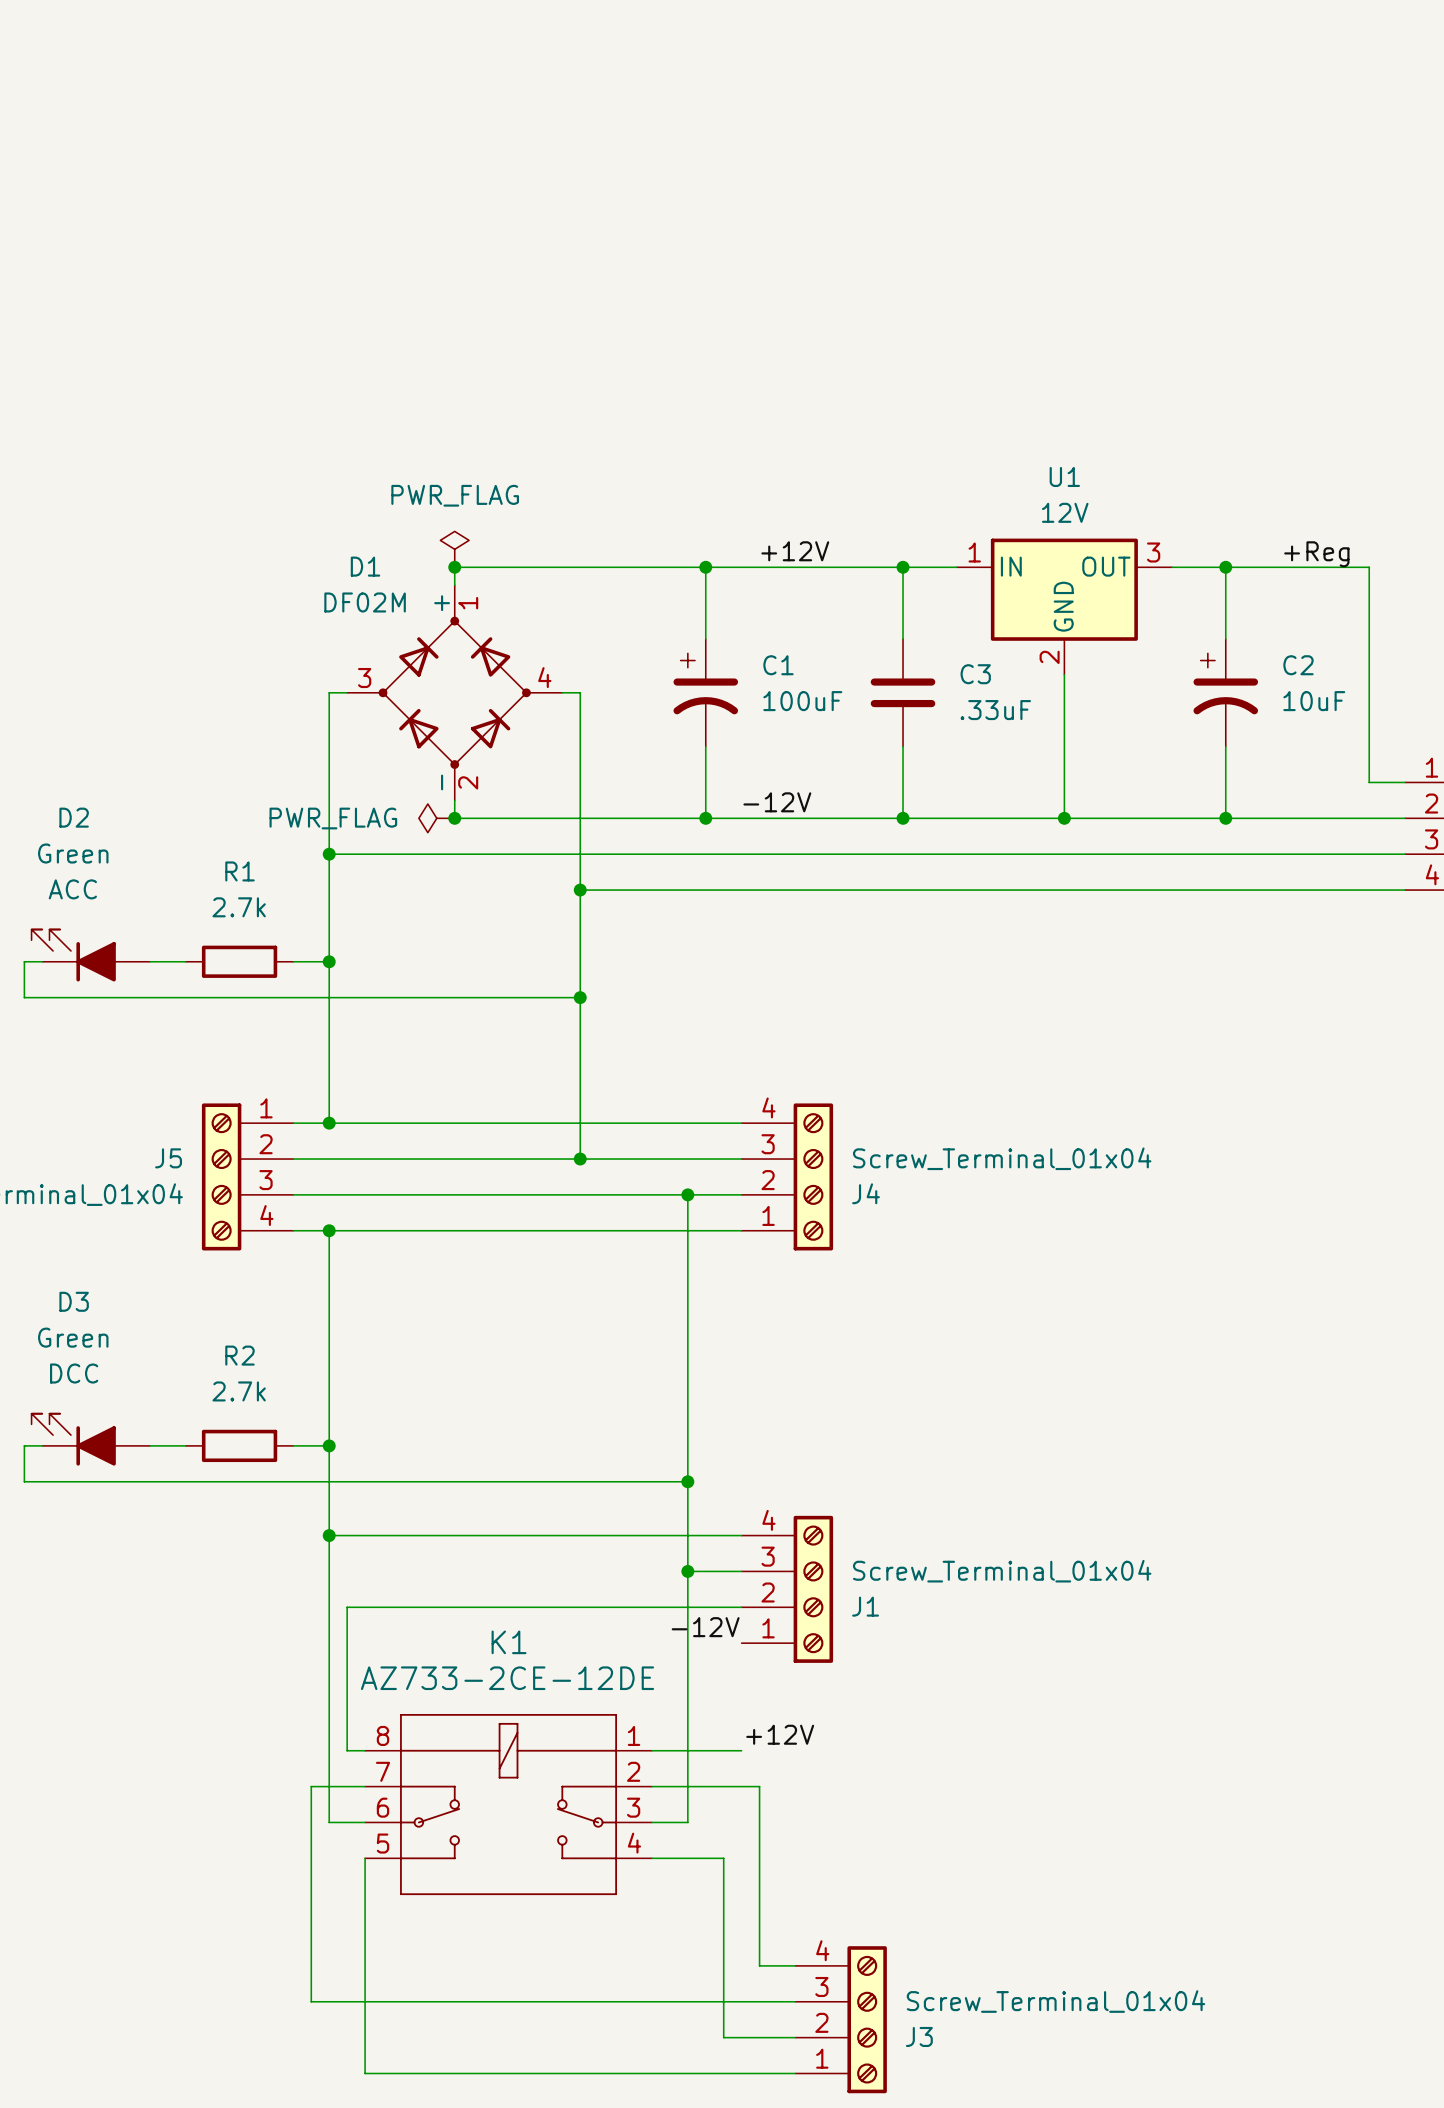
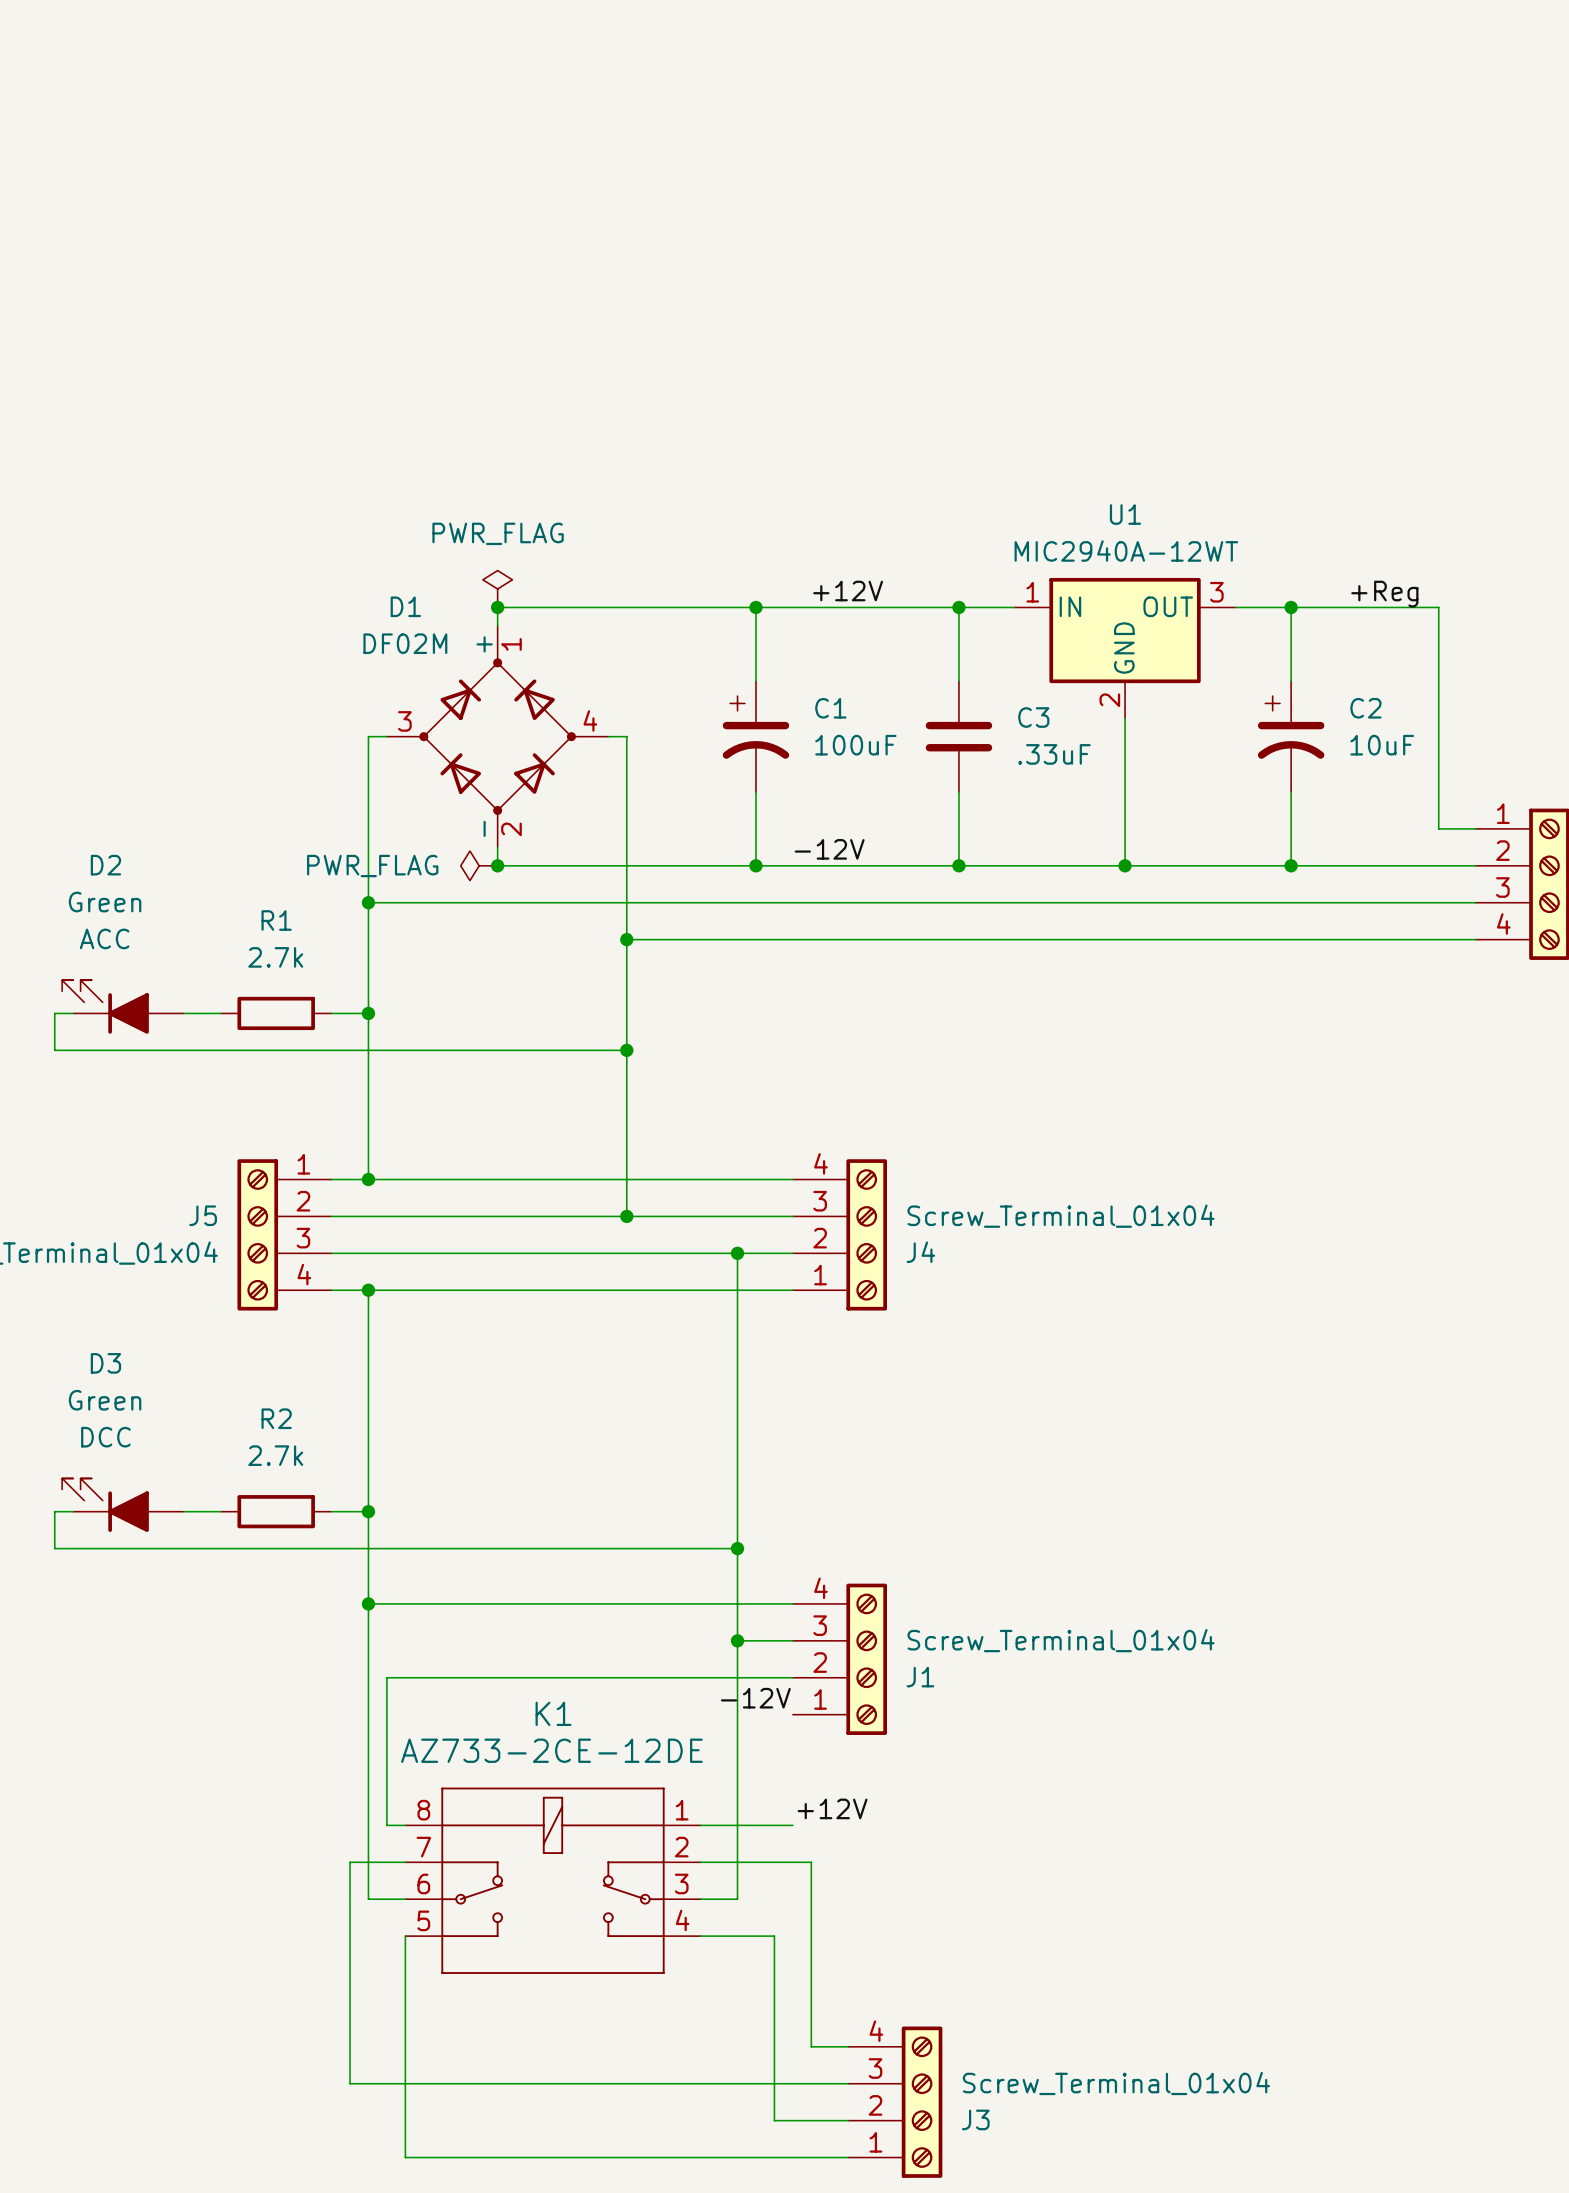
U1 value: 12V (1065, 512) -> MIC2940A-12WT (1126, 550)

